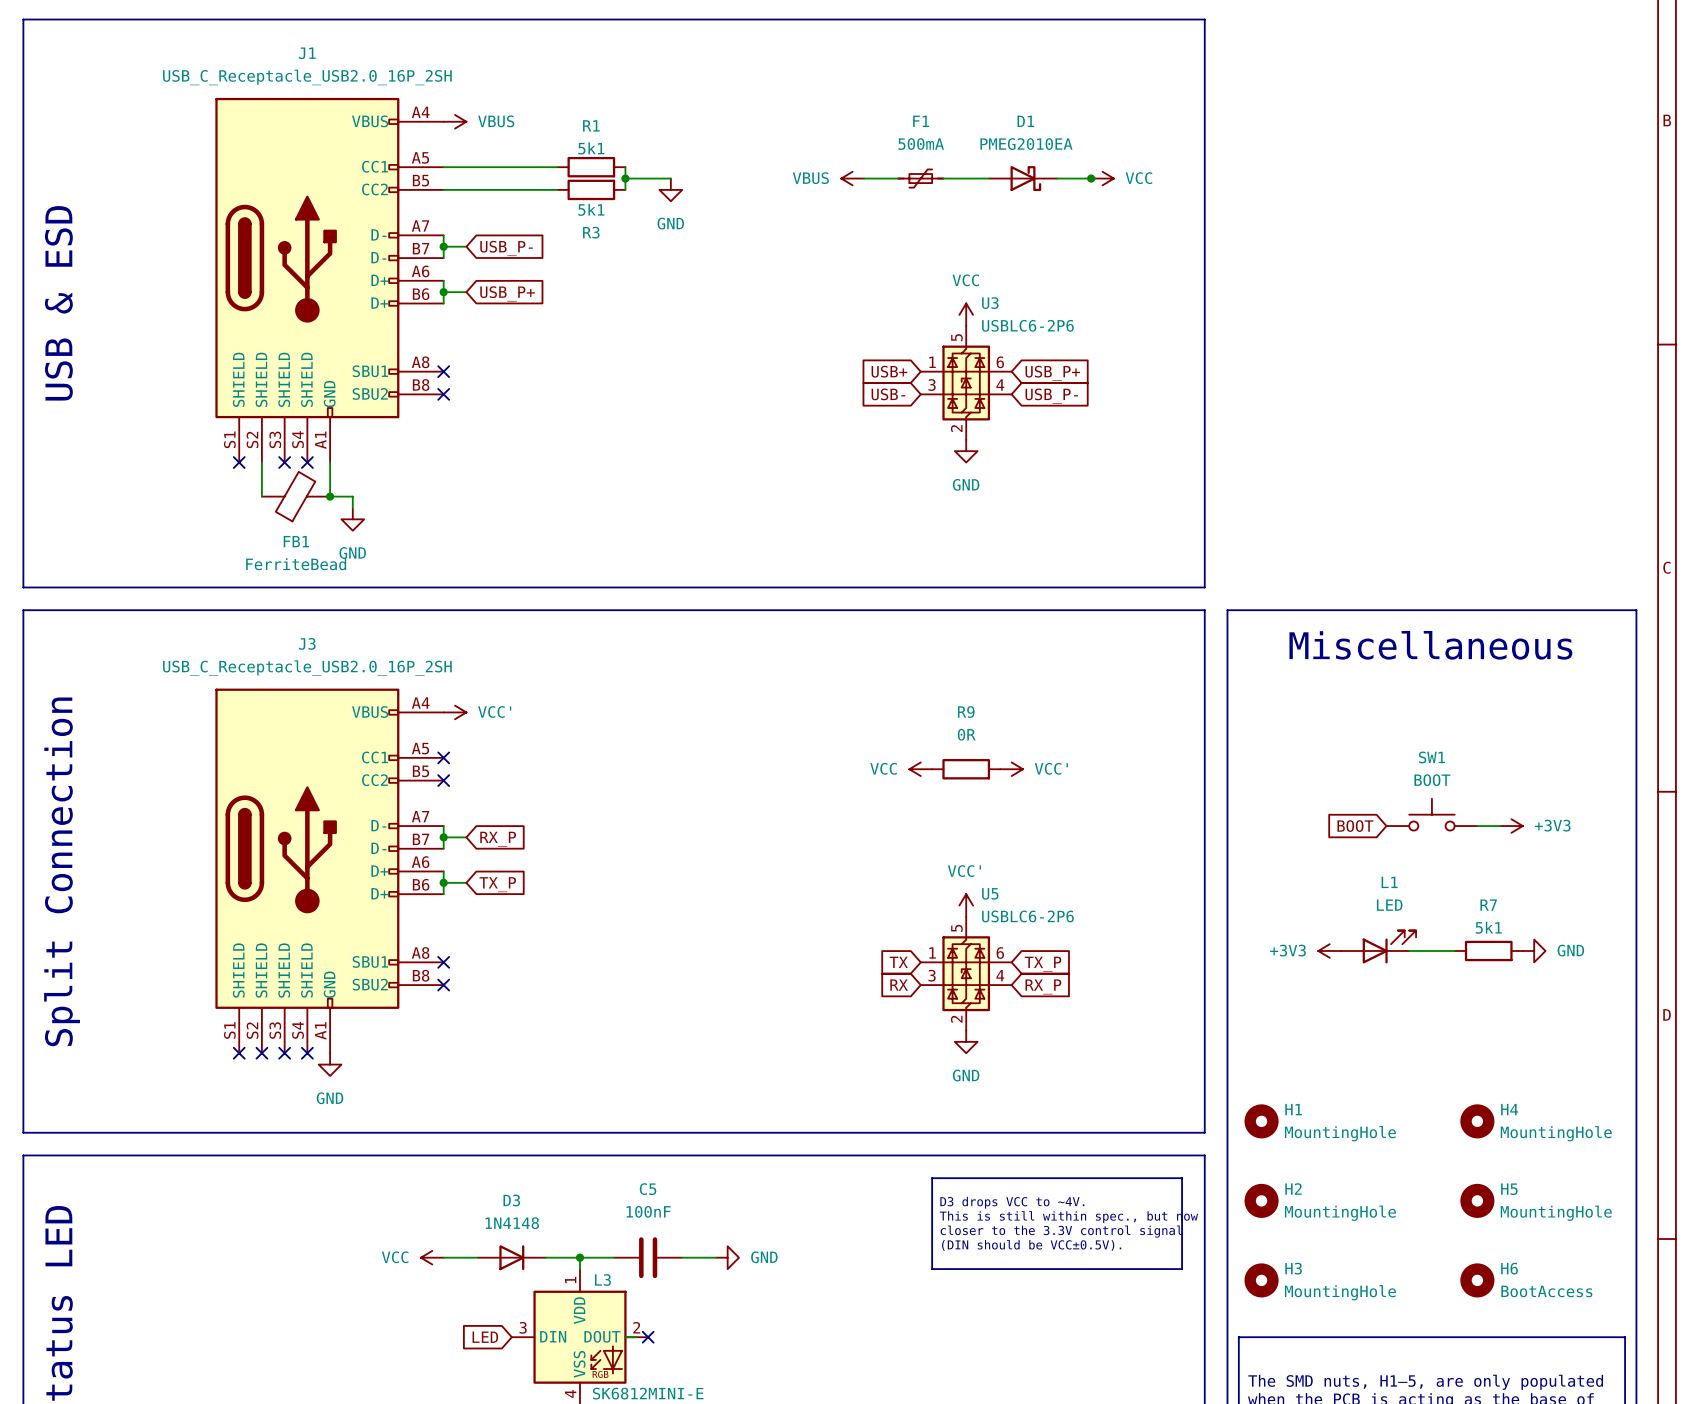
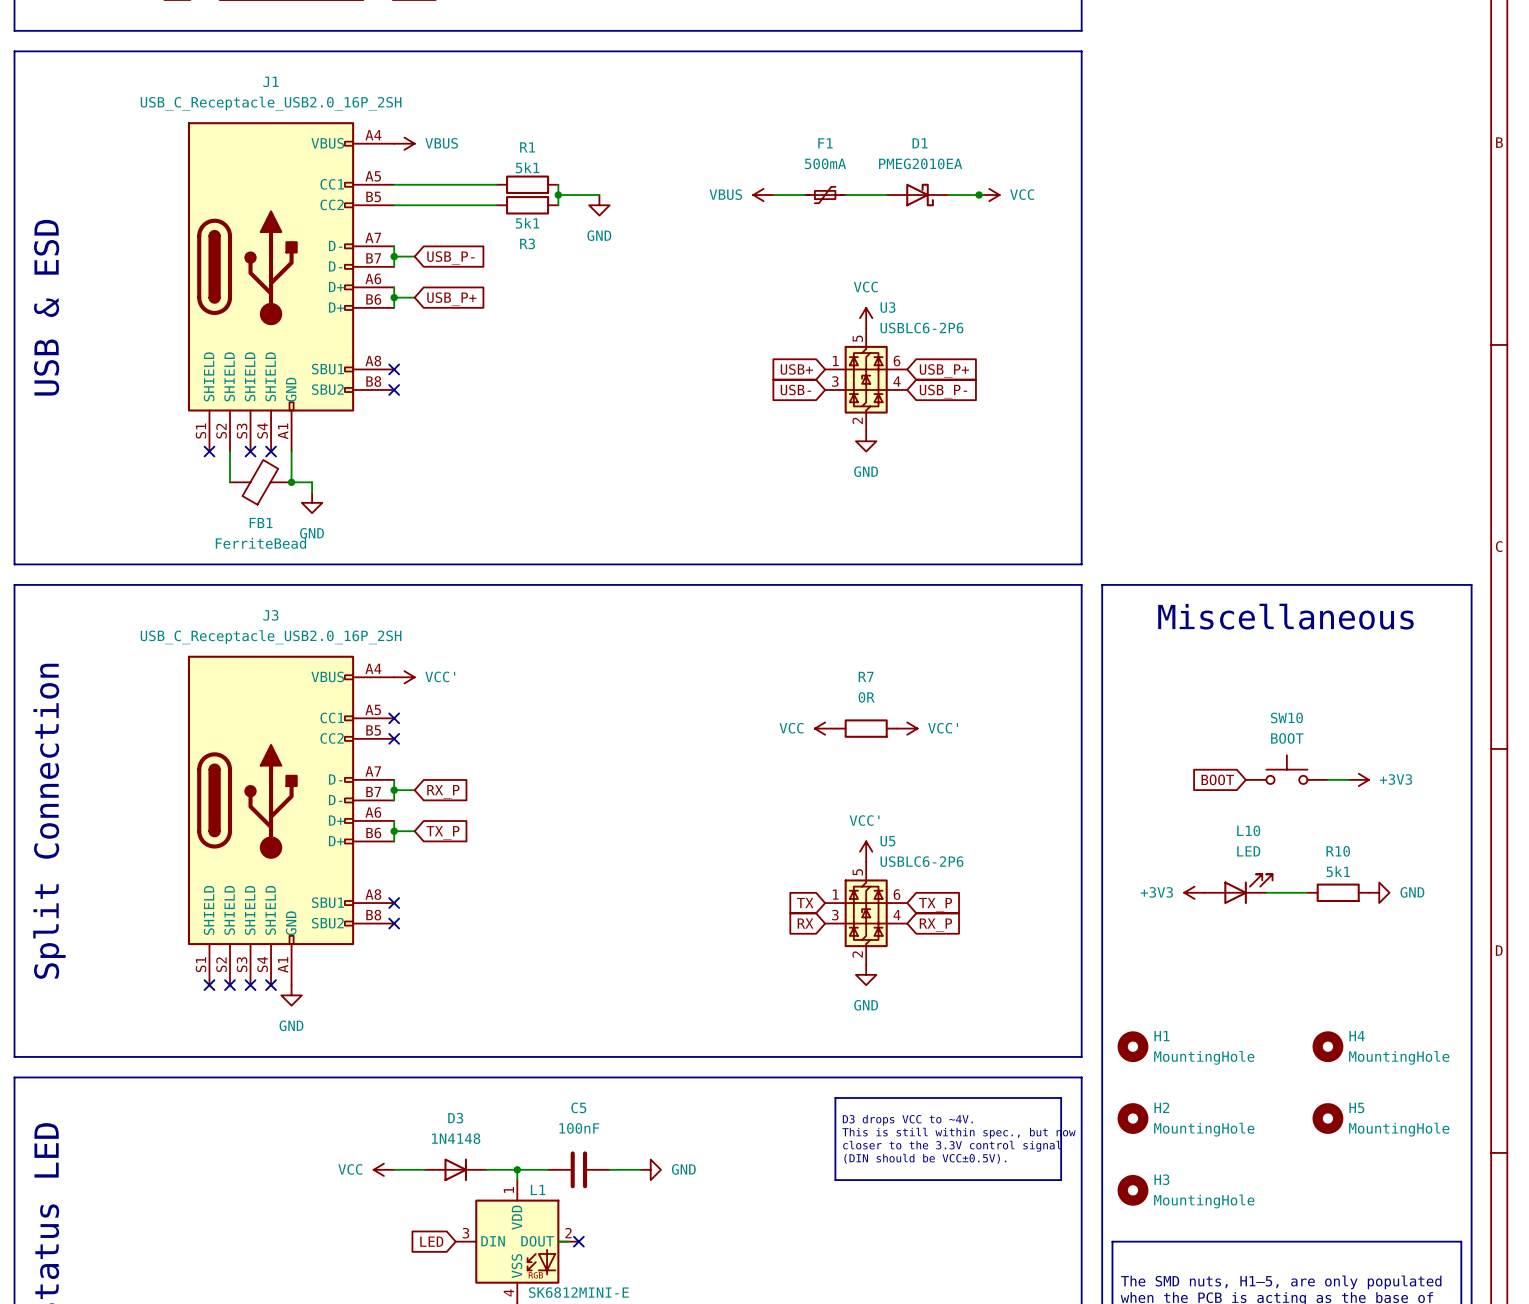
R9 name: R9 (966, 712) -> R7 (866, 676)
SW1 name: SW1 (1431, 757) -> SW10 (1286, 717)
L1 name: L1 (1389, 882) -> L10 (1248, 830)
R7 name: R7 (1488, 905) -> R10 (1338, 851)
L3 name: L3 (602, 1279) -> L1 (538, 1189)
H6: BootAccess (1477, 1280) -> none

